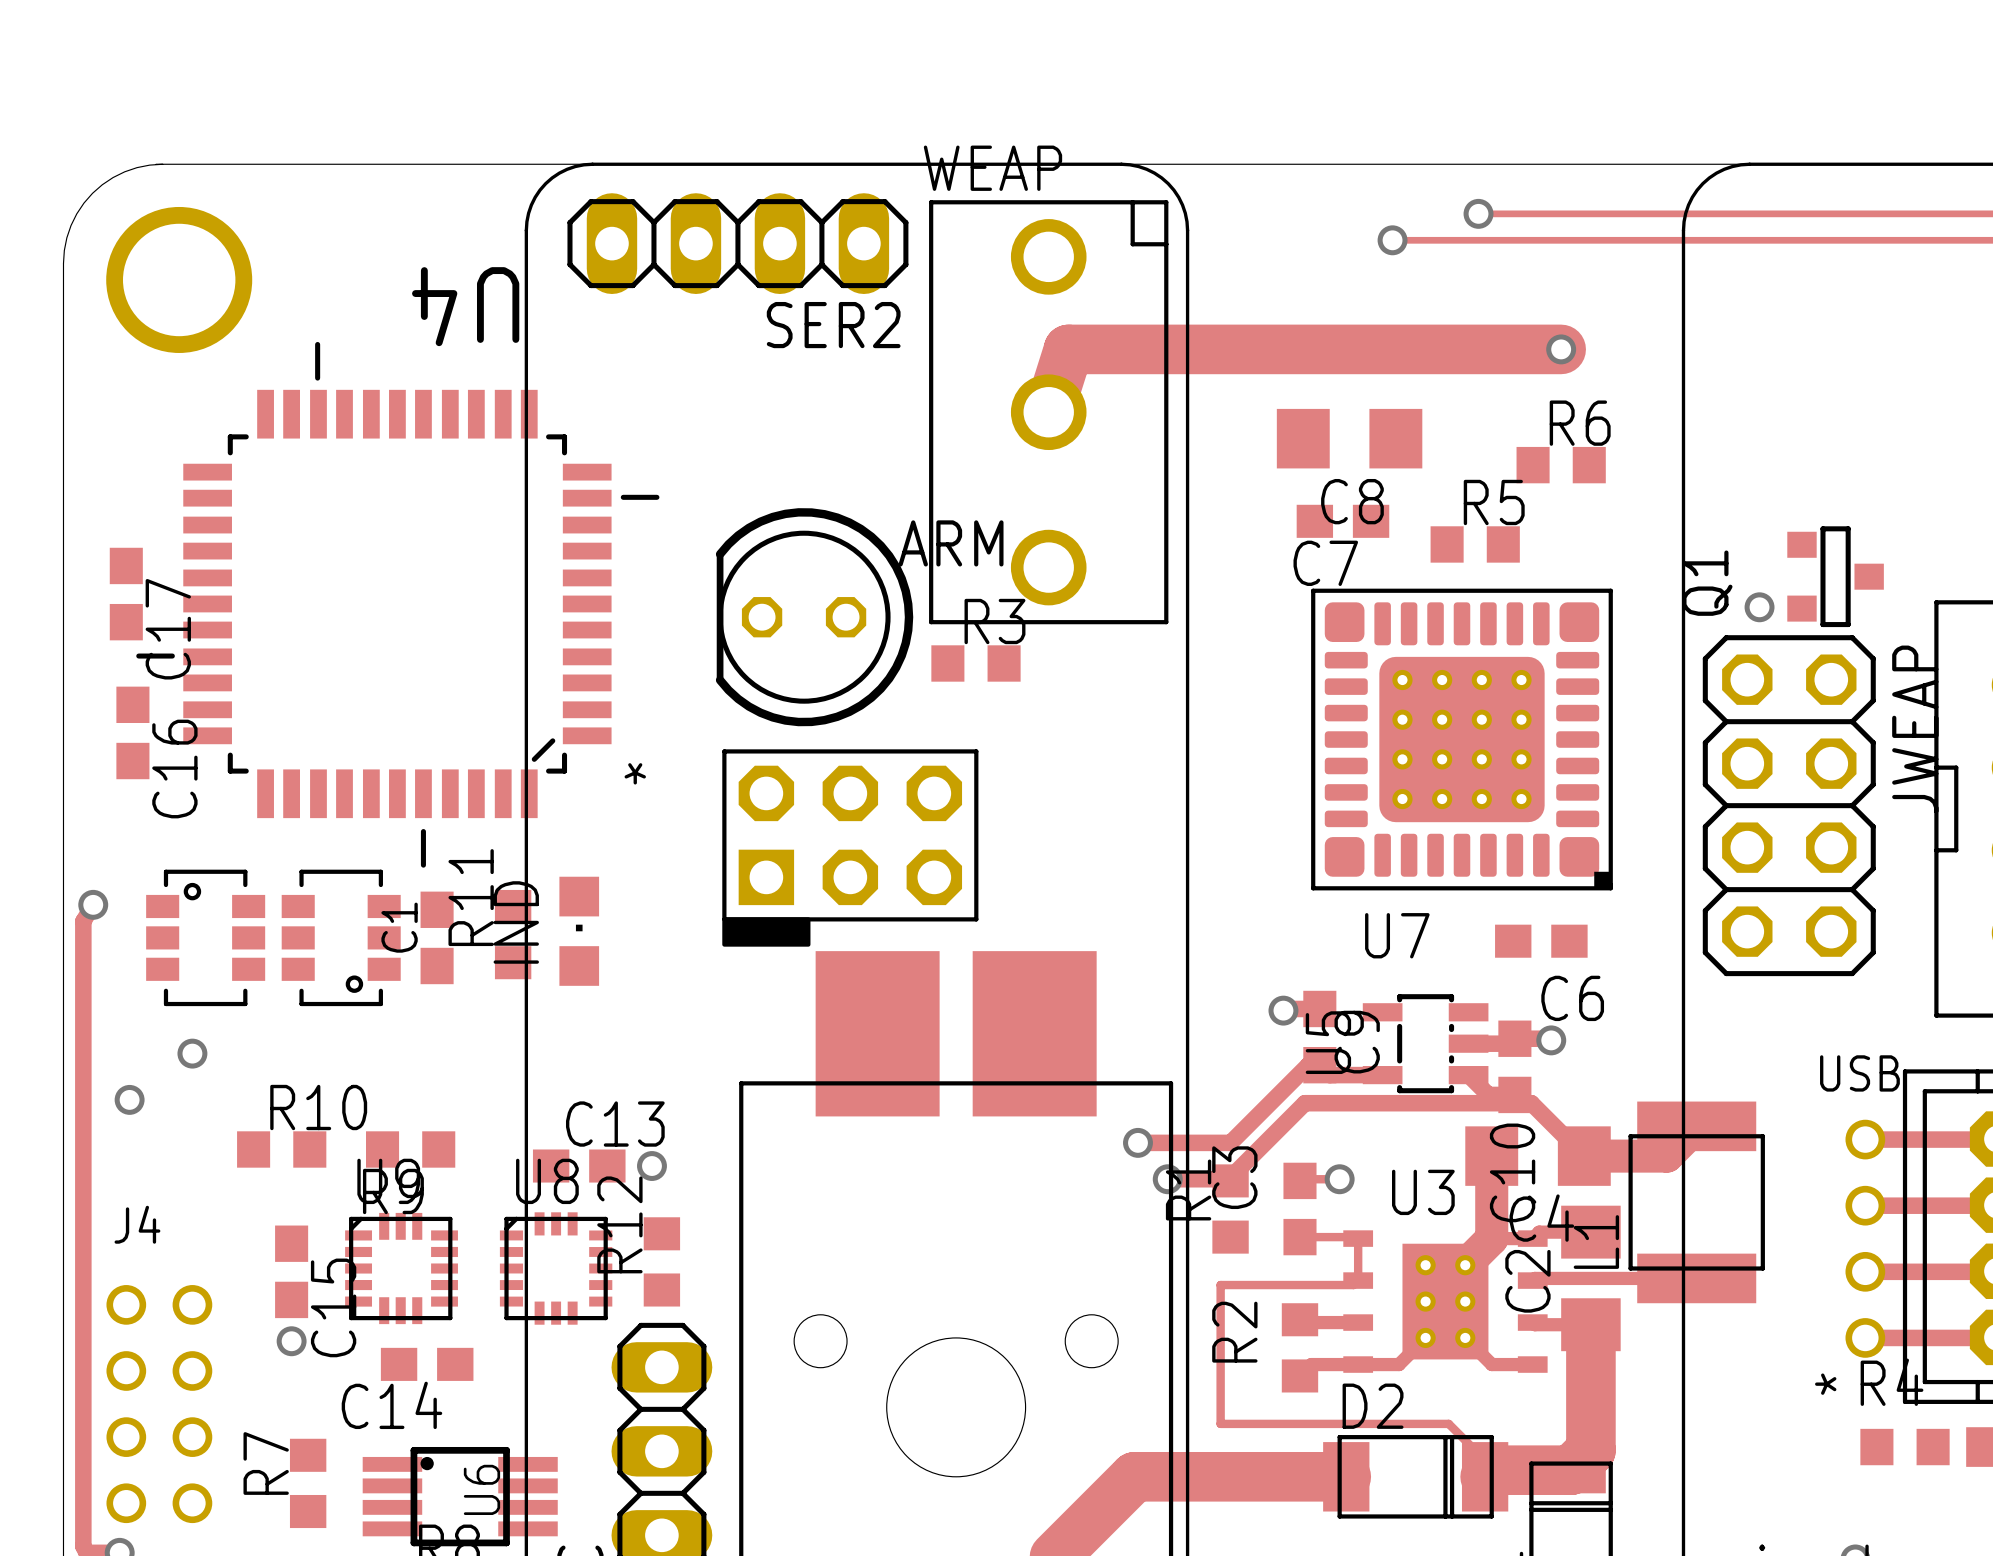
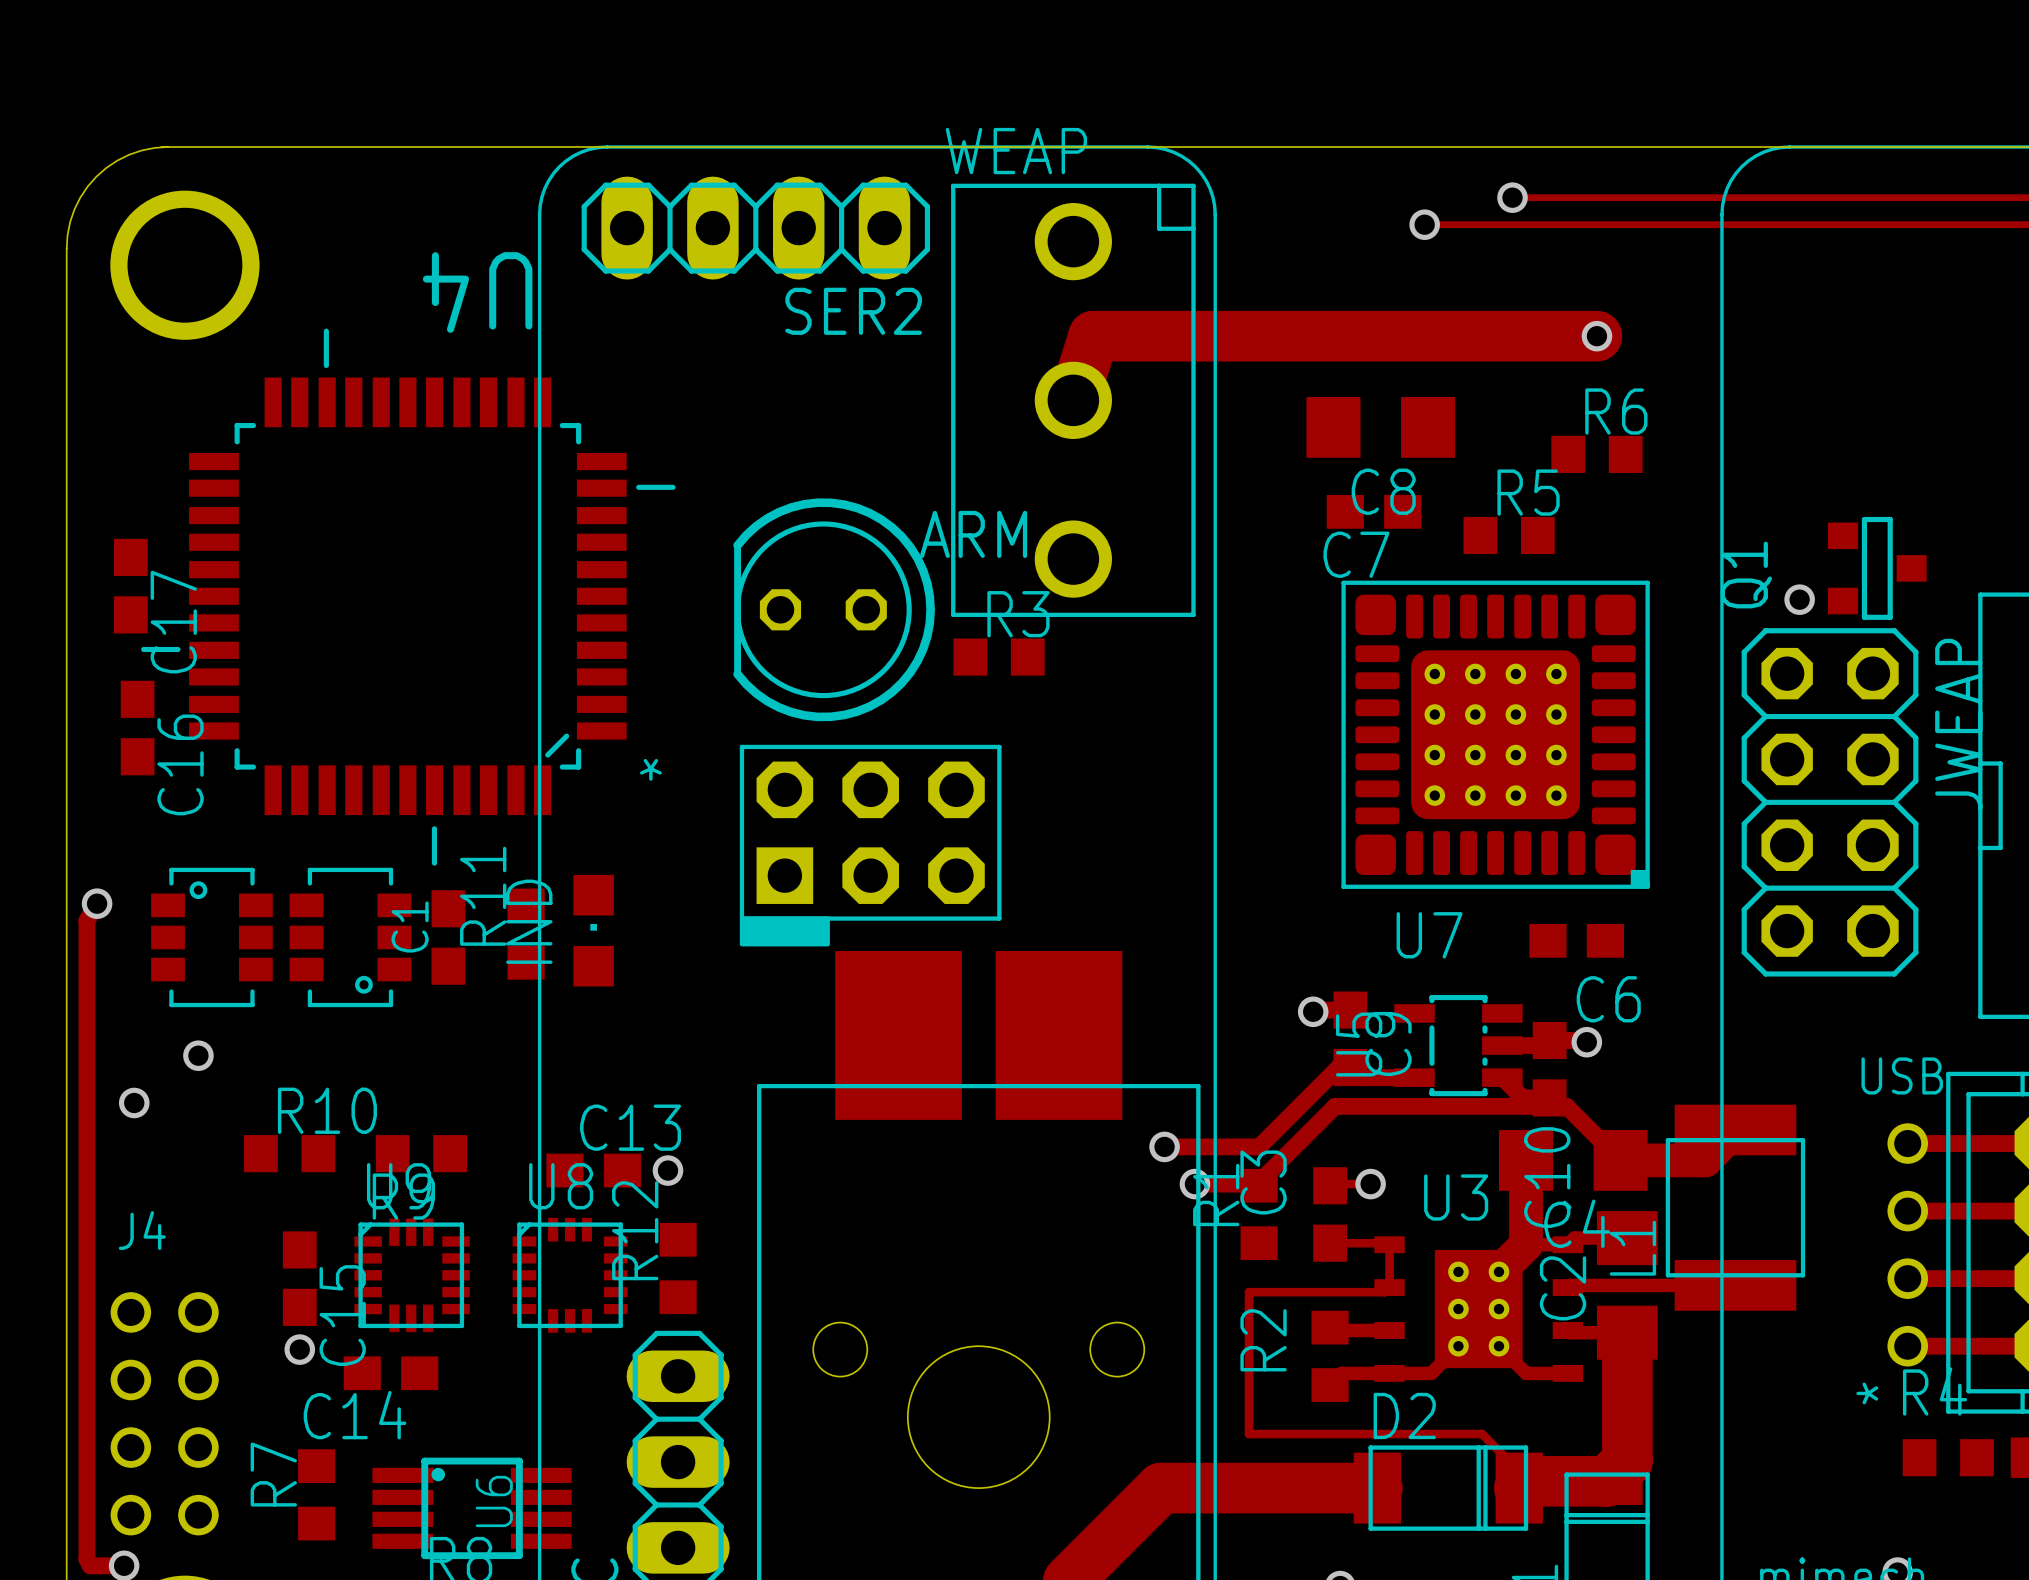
C14 position: (427, 1364) -> (390, 1373)

